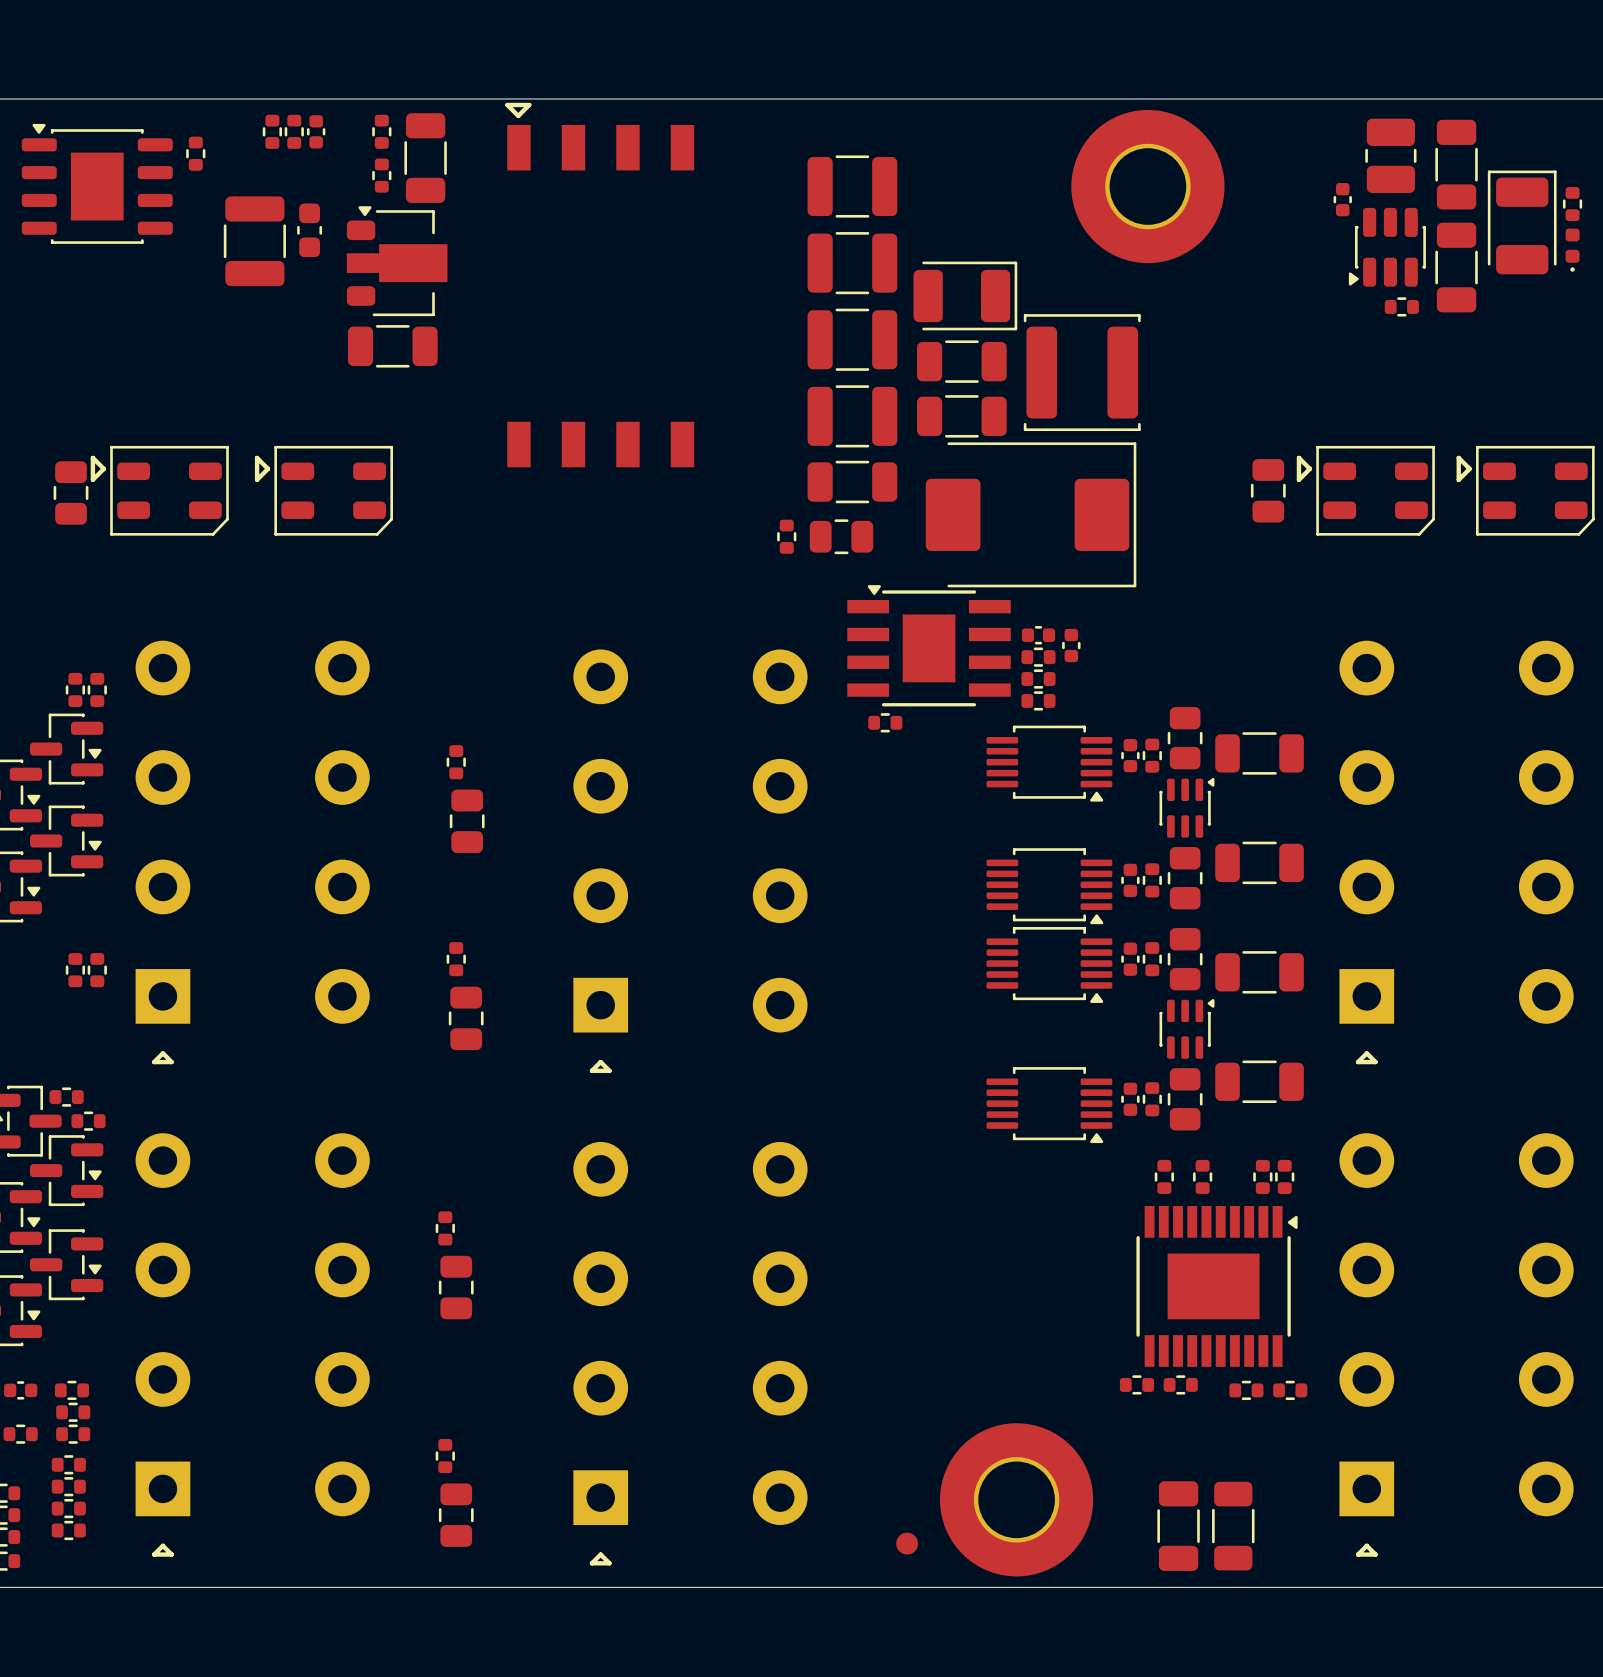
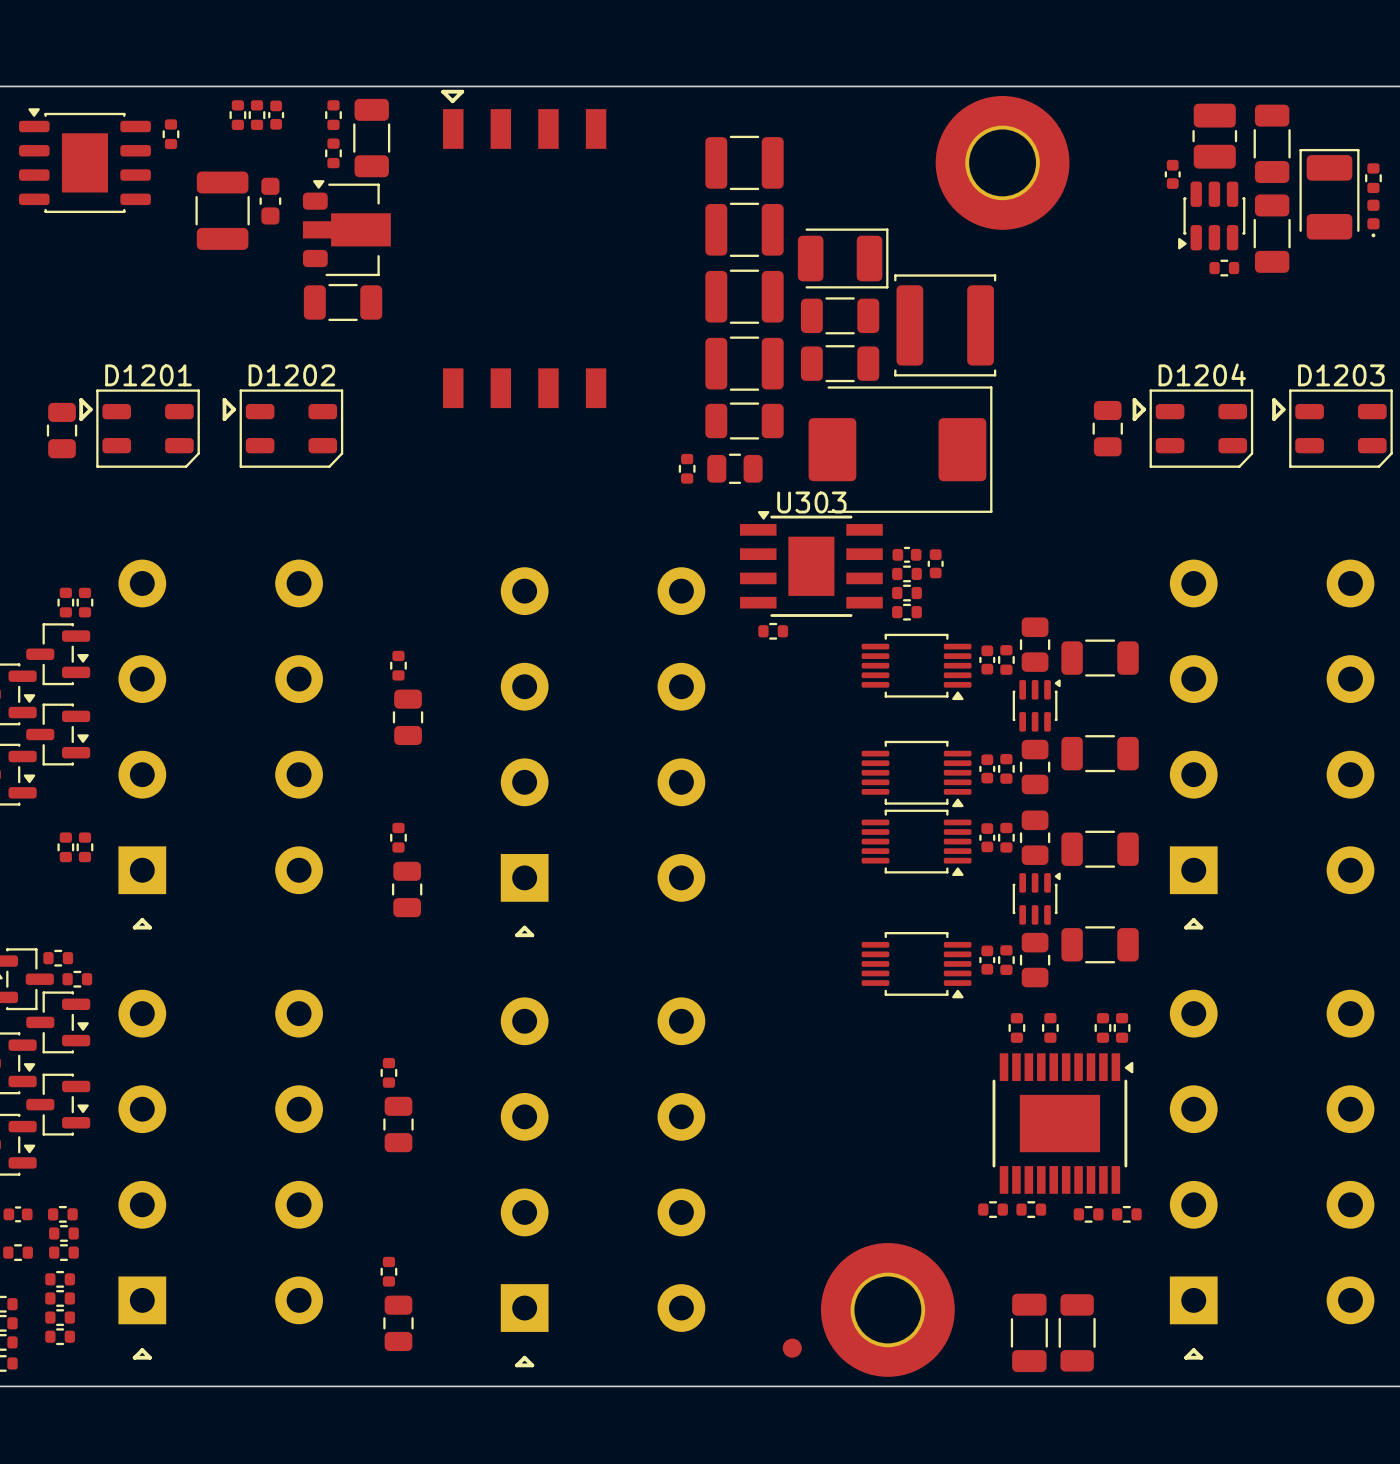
D1201 name: none -> D1201 (148, 375)
D1202 name: none -> D1202 (291, 375)
D1204 name: none -> D1204 (1202, 374)
D1203 name: none -> D1203 (1341, 375)
U303 name: none -> U303 (811, 502)

